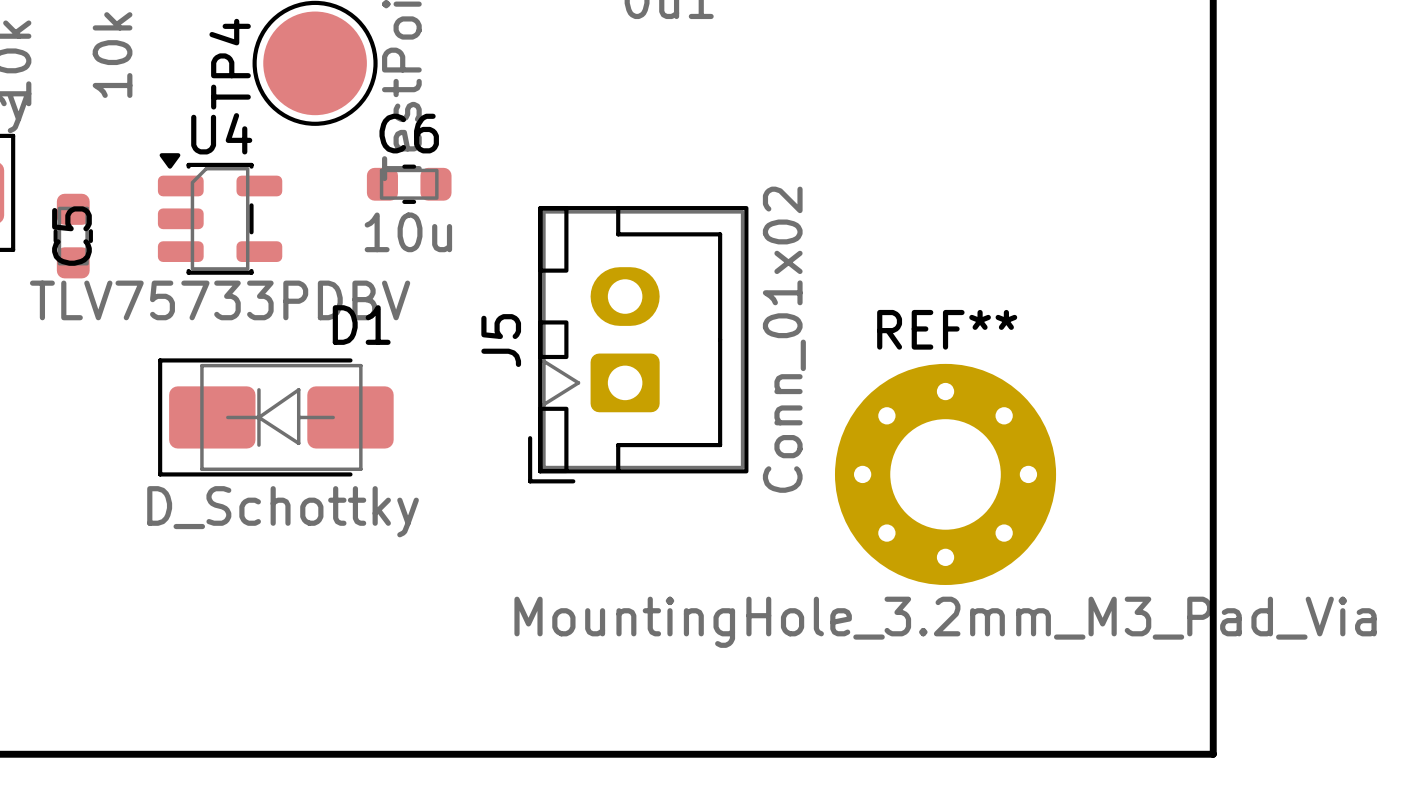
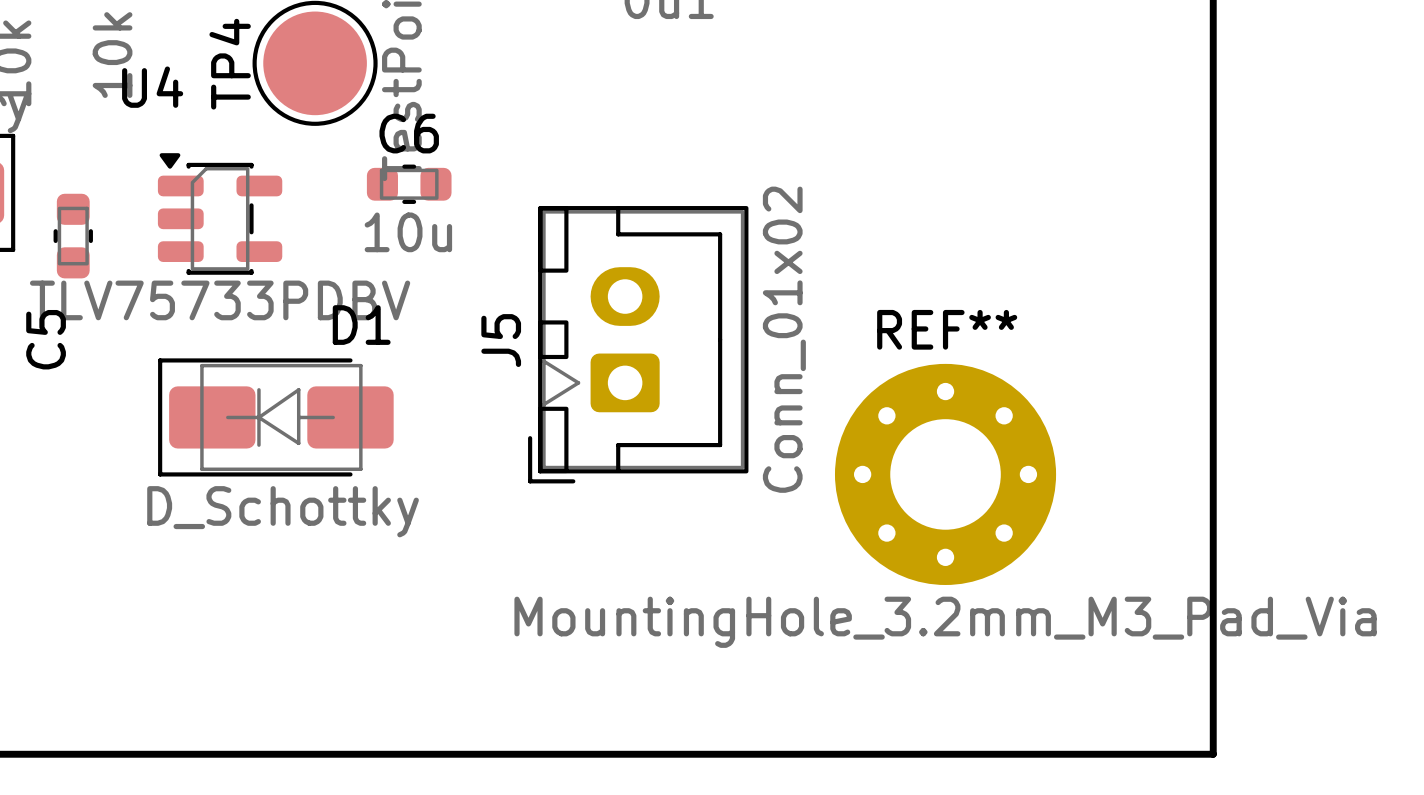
U4 name position: U4 (221, 133) -> U4 (152, 87)
C5 name position: C5 (71, 236) -> C5 (46, 339)

